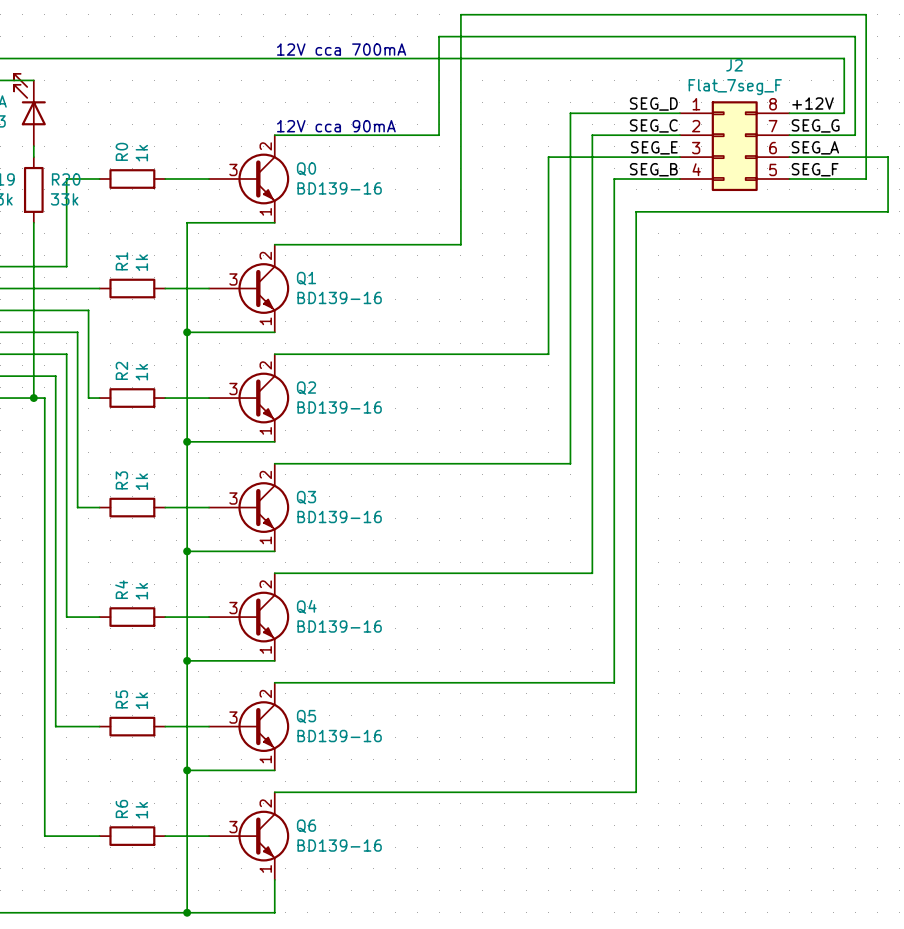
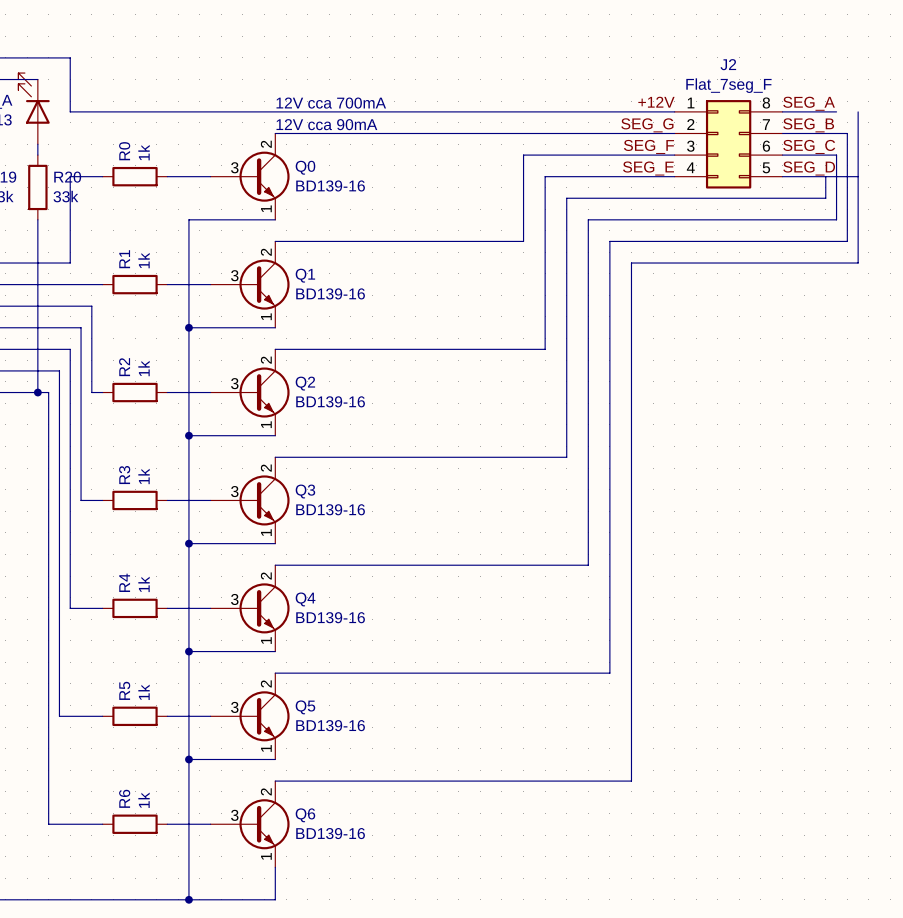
text position: 12V cca 700mA (341, 49) -> 12V cca 700mA (331, 103)
wire: (66, 58) (844, 58) (844, 113) -> (70, 57) (70, 111) (566, 111)
label: +12V (813, 103) -> SEG_A (809, 103)
label: SEG_D (653, 104) -> +12V (656, 102)
wire: (570, 113) (570, 200) -> (825, 176) (825, 198) (566, 198)
wire: (866, 113) (866, 14) (460, 14) (460, 244) -> (545, 155) (523, 155) (523, 241) (458, 241)
label: SEG_C (653, 125) -> SEG_G (647, 125)
label: SEG_G (815, 125) -> SEG_B (808, 125)
wire: (439, 135) (439, 36) (855, 36) (855, 135) -> (609, 241) (847, 241) (847, 133)
wire: (592, 135) (592, 222) -> (588, 133) (437, 133)
label: SEG_E (654, 147) -> SEG_F (648, 146)
label: SEG_A (815, 147) -> SEG_C (809, 146)
wire: (548, 157) (548, 178) -> (609, 176) (545, 176)
wire: (844, 157) (888, 157) (888, 211) (636, 211) (636, 266) -> (858, 176) (858, 263) (631, 263)
wire: none -> (836, 155) (836, 219) (588, 219)
label: SEG_B (653, 169) -> SEG_E (648, 168)
label: SEG_F (815, 169) -> SEG_D (809, 168)
wire: (614, 178) (614, 244) -> none

